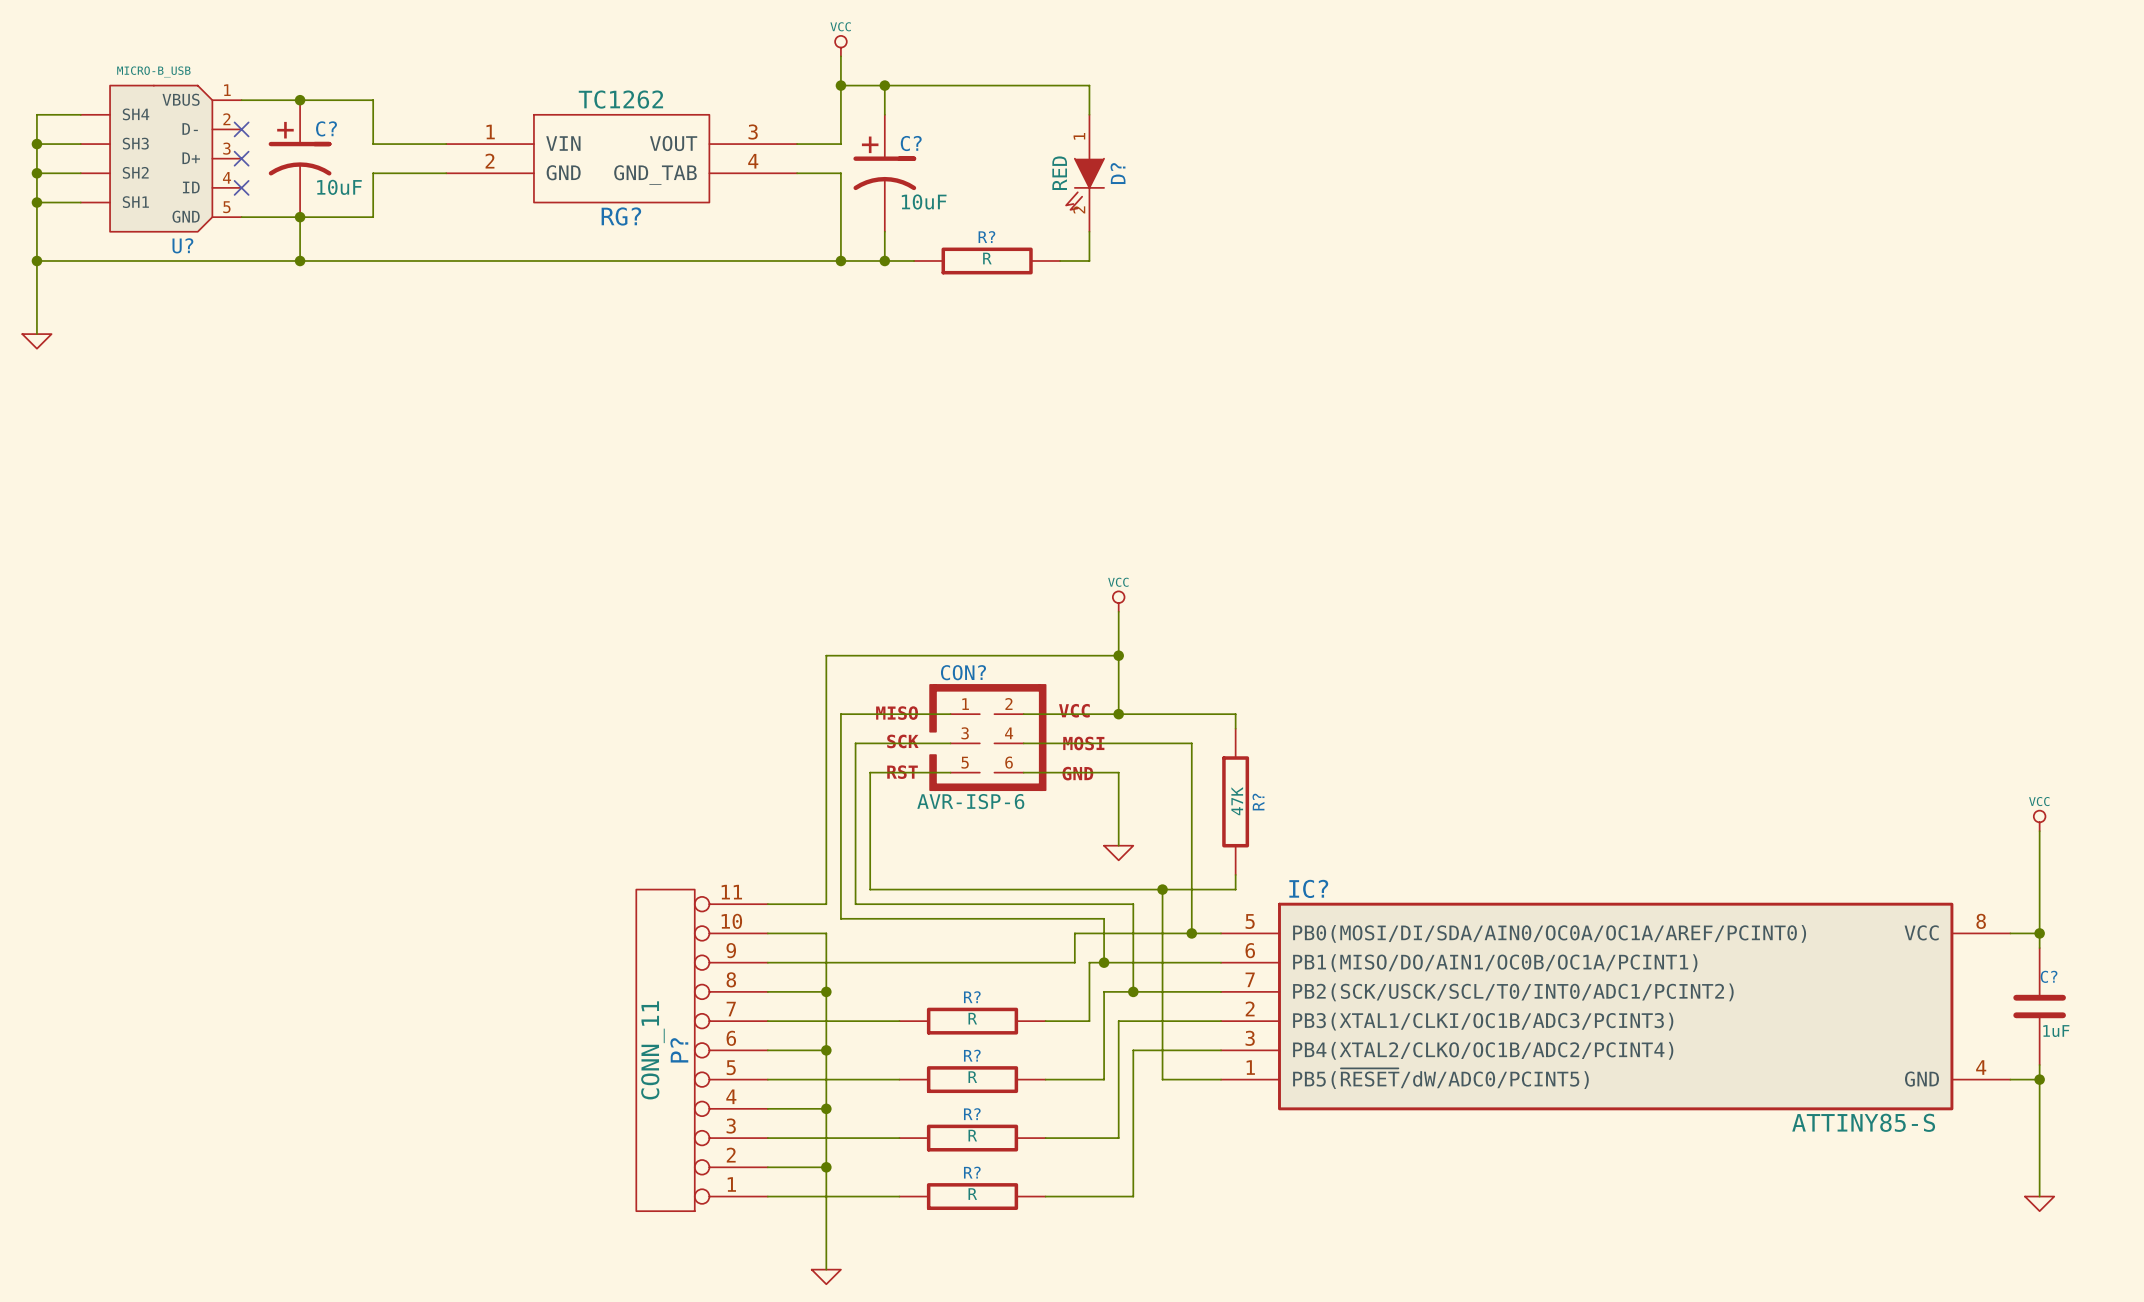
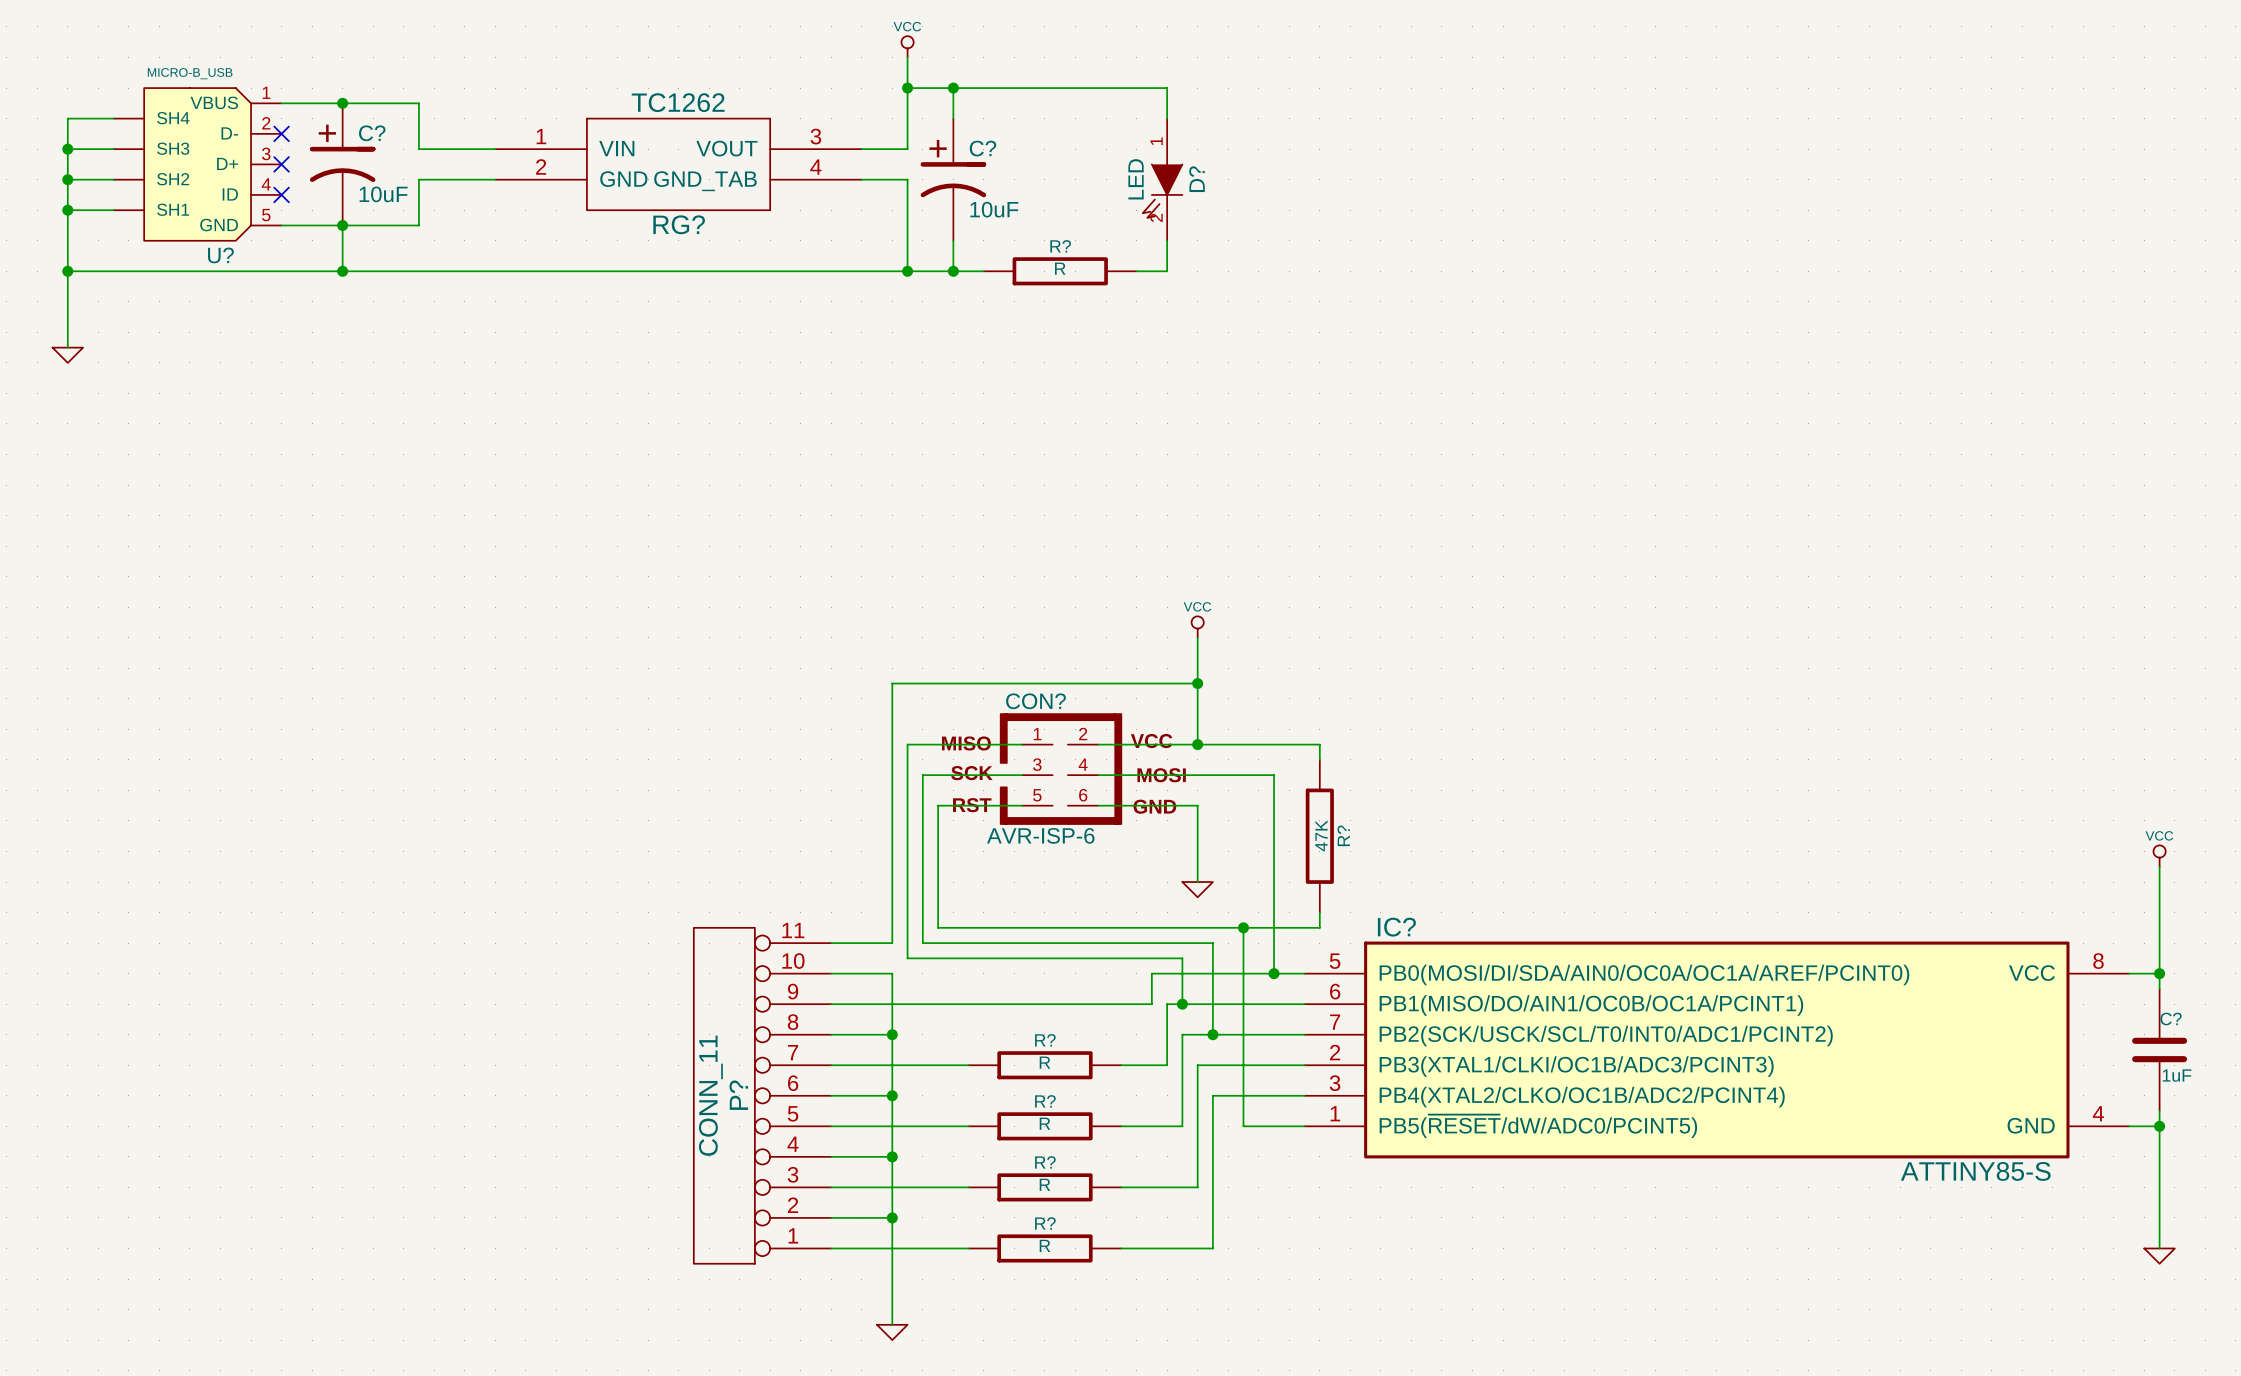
D? value: RED (1059, 173) -> LED (1136, 179)

